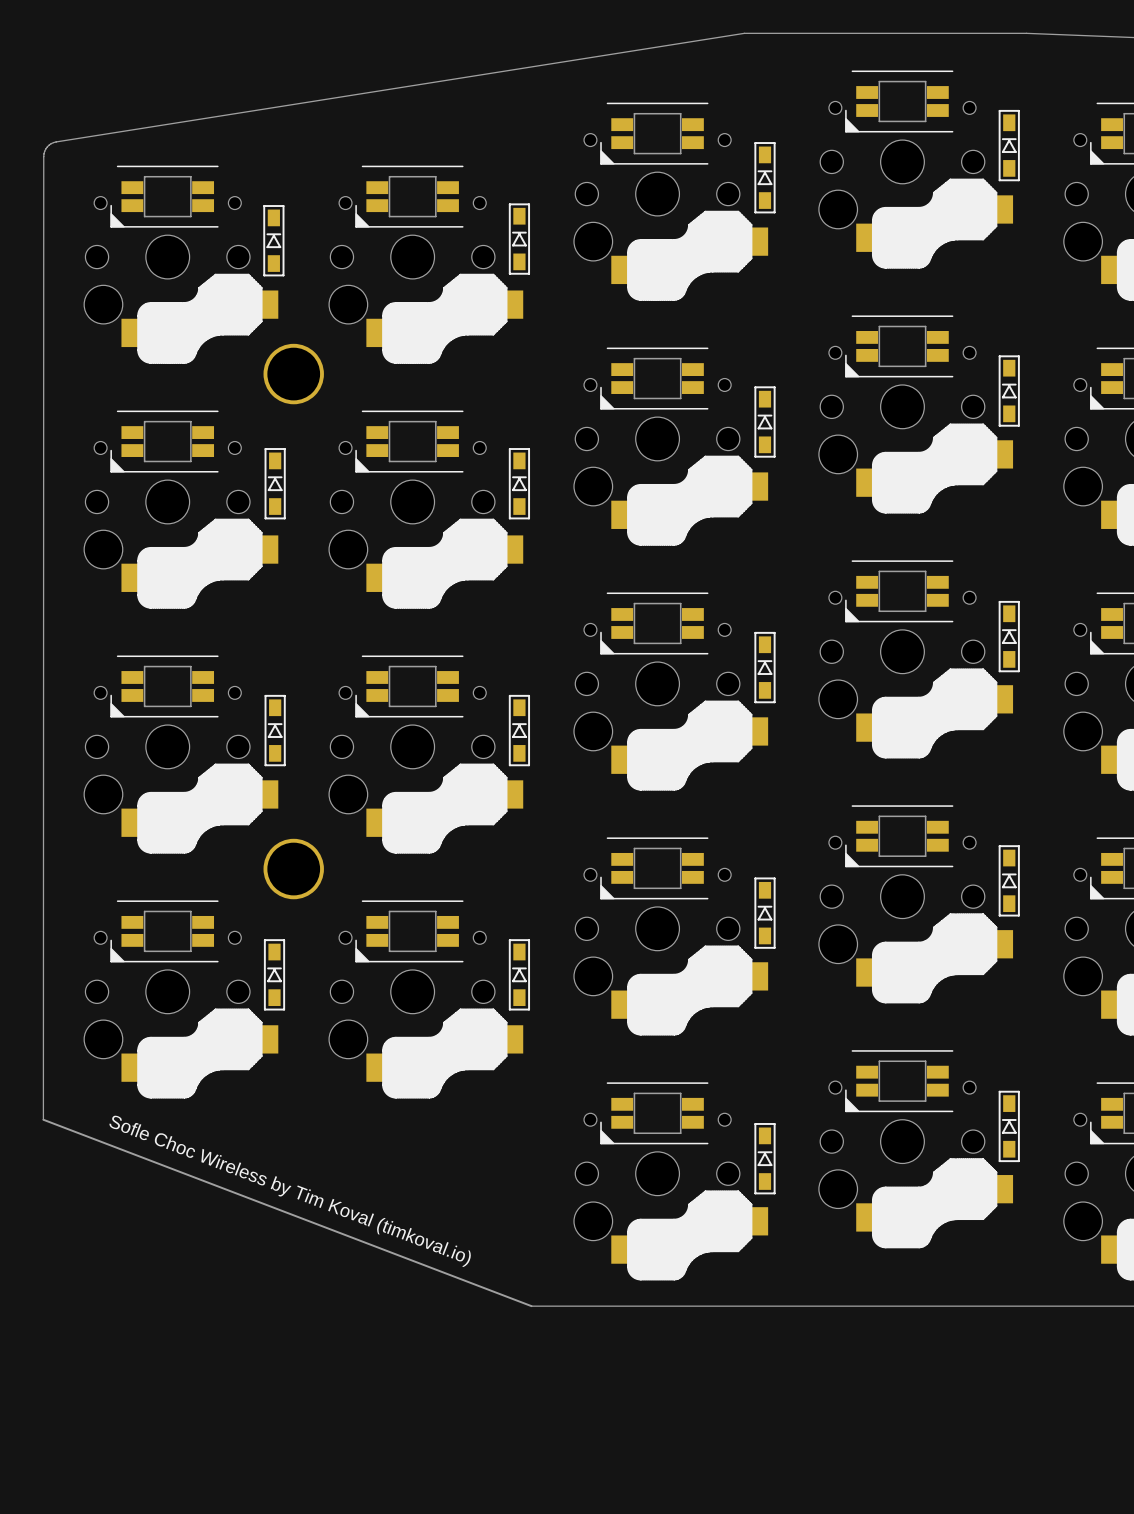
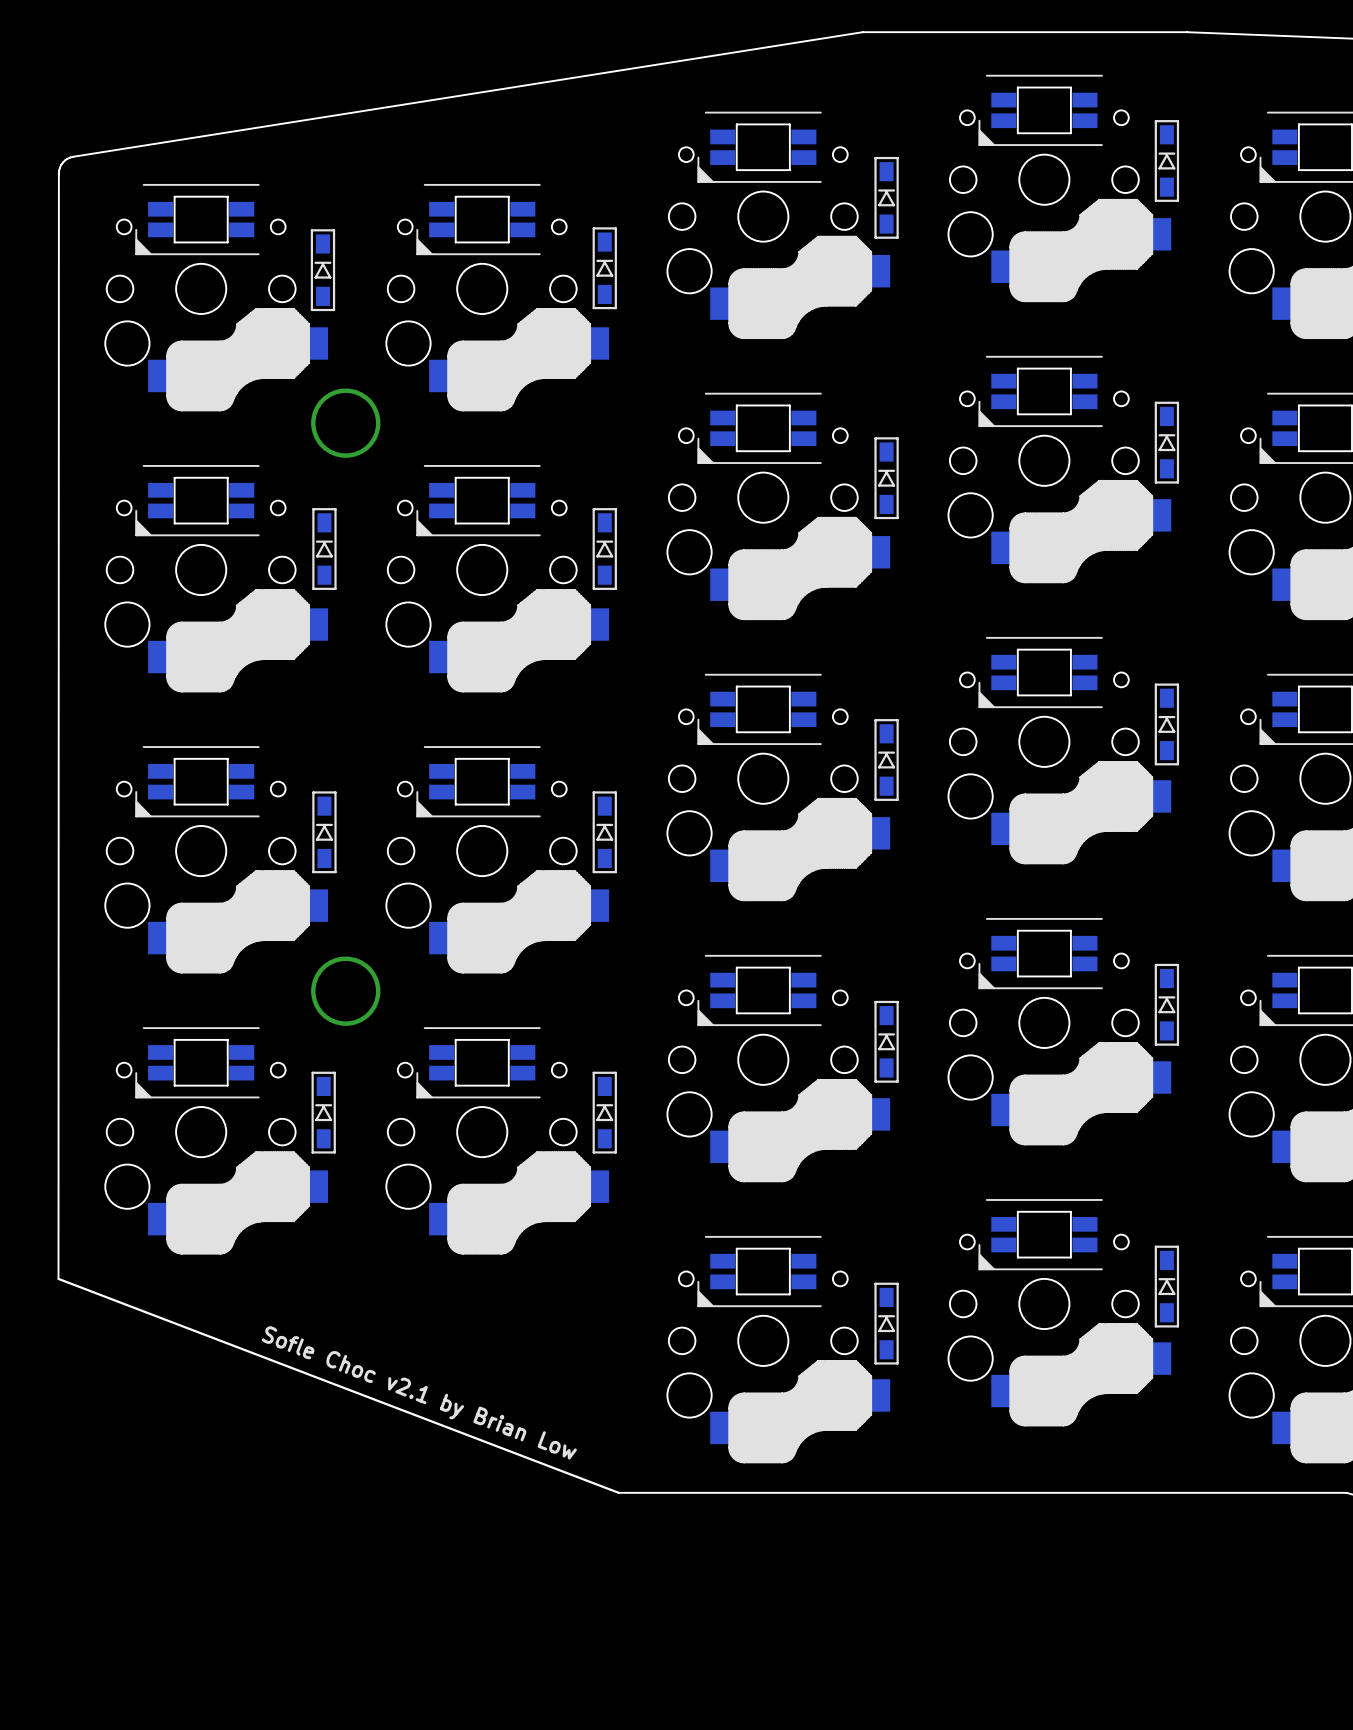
text: Sofle Choc Wireless by Tim Koval (timkoval.io) (289, 1191) -> none
text: none -> Sofle Choc v2.1 by Brian Low (419, 1392)

